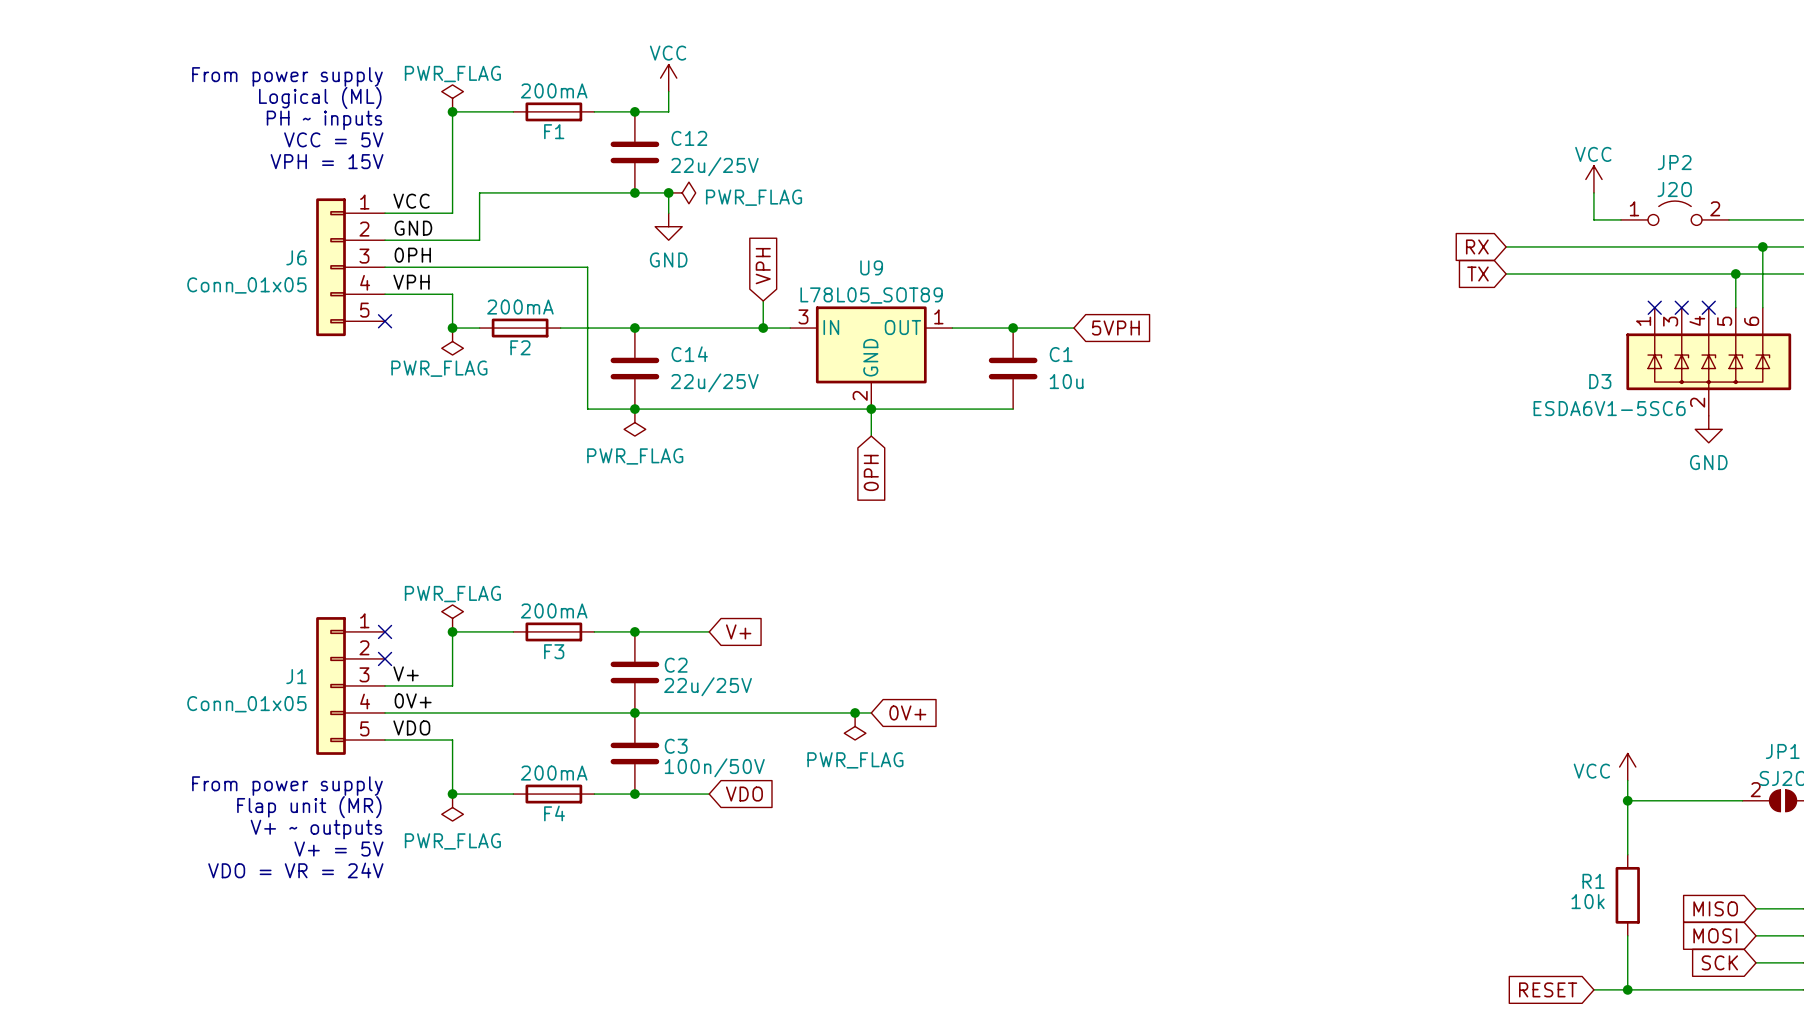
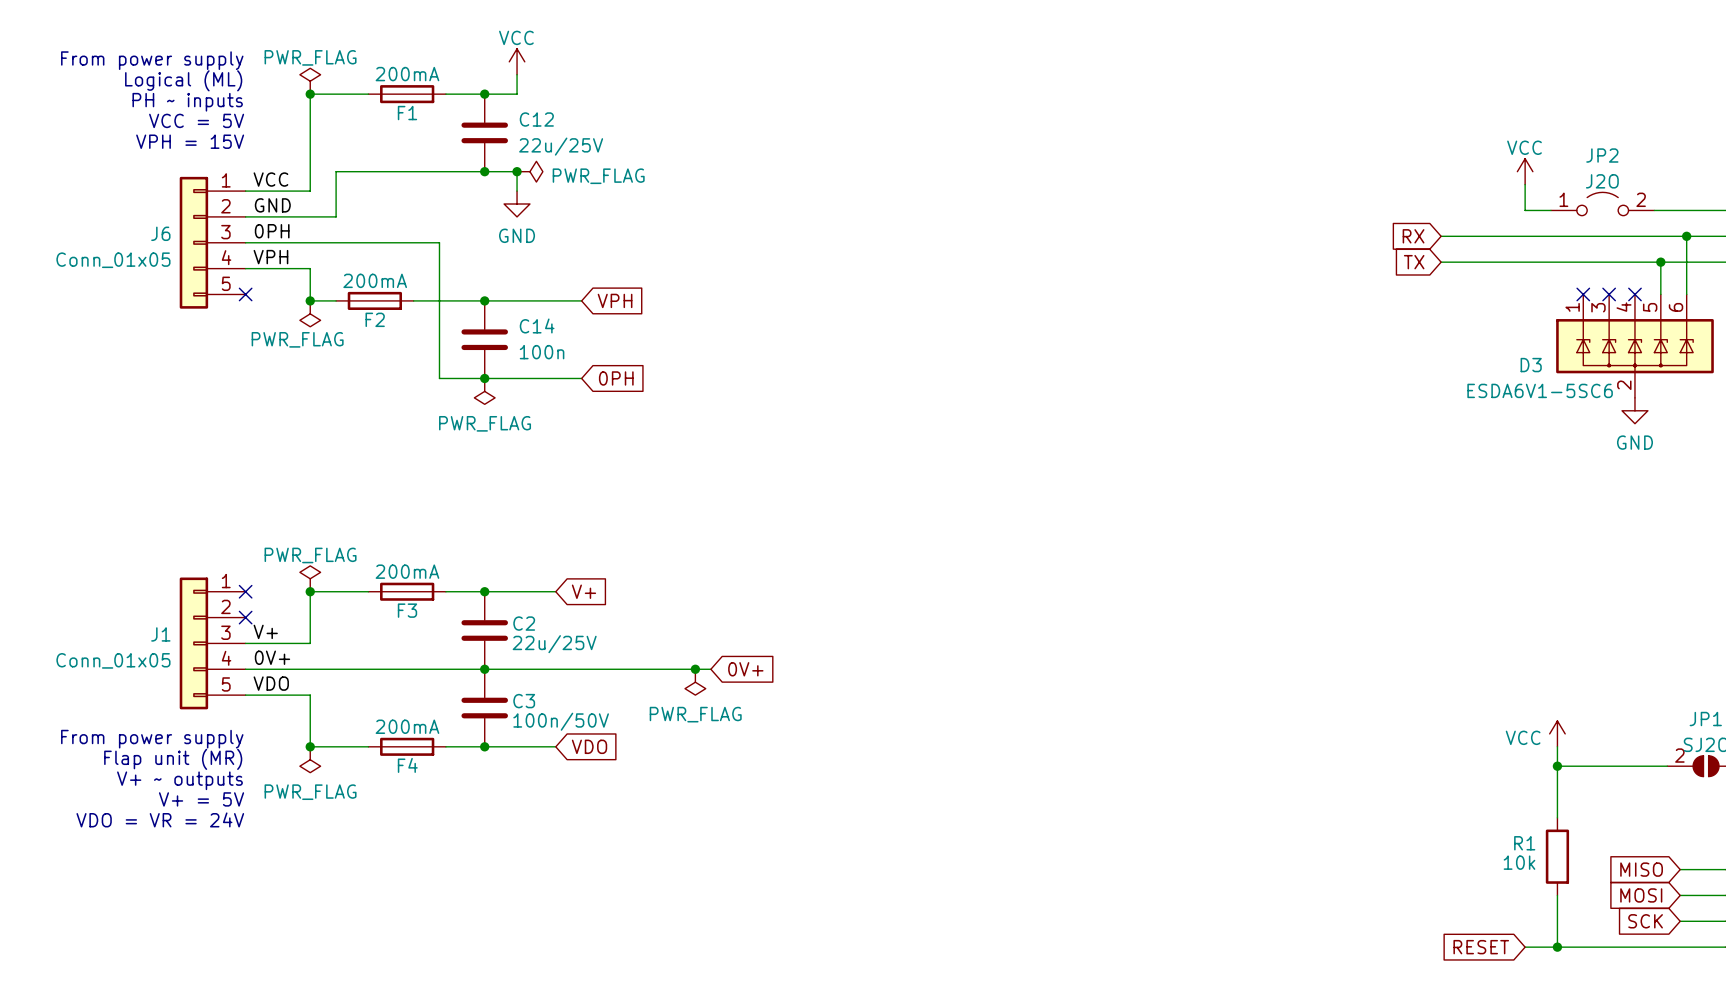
text position: From power supply (287, 76) -> From power supply (152, 60)
power symbol position: VCC (668, 78) -> VCC (517, 61)
power symbol: none -> PWR_FLAG (310, 81)
wire: (668, 91) (668, 111) (594, 111) -> (517, 74) (517, 94) (445, 94)
text position: Logical (ML) (320, 97) -> Logical (ML) (183, 80)
junction: none -> (310, 94)
power symbol: PWR_FLAG (452, 98) -> none
junction: none -> (484, 94)
junction: (452, 111) -> none
wire: (513, 111) (452, 111) (452, 213) (385, 213) -> (368, 94) (310, 94) (310, 191) (245, 191)
F1 position: (553, 111) -> (407, 94)
junction: (634, 111) -> none
text position: PH ~ inputs (324, 120) -> PH ~ inputs (187, 102)
text position: VCC = 5V (333, 139) -> VCC = 5V (196, 120)
C12 position: (634, 152) -> (484, 132)
text position: VPH = 15V (327, 161) -> VPH = 15V (190, 141)
junction: none -> (484, 171)
junction: none -> (517, 171)
power symbol: none -> PWR_FLAG (529, 171)
junction: (634, 192) -> none
junction: (668, 192) -> none
power symbol: PWR_FLAG (682, 192) -> none
label position: VCC (411, 201) -> VCC (270, 179)
wire: (668, 213) (668, 192) (479, 192) (479, 240) (385, 240) -> (517, 191) (517, 171) (336, 171) (336, 216) (245, 216)
power symbol position: GND (668, 226) -> GND (517, 204)
label position: GND (413, 228) -> GND (272, 205)
wire: none -> (245, 242) (439, 242) (439, 378) (581, 378)
label position: 0PH (412, 255) -> 0PH (272, 231)
global label rotation: 0° (763, 266) -> 90° clockwise (615, 300)
global label position: VPH (763, 266) -> VPH (615, 300)
J6 position: (350, 267) -> (212, 242)
wire: (385, 267) (587, 267) (587, 409) (1013, 409) -> none
label position: VPH (411, 282) -> VPH (270, 257)
wire: (385, 294) (452, 294) (452, 328) (479, 328) -> (245, 268) (310, 268) (310, 300) (336, 300)
wire: (763, 301) (763, 328) -> none
no-connect mark: none -> (245, 294)
junction: none -> (310, 300)
wire: none -> (413, 300) (581, 300)
junction: none -> (484, 300)
no-connect mark: (385, 321) -> none
power symbol: none -> PWR_FLAG (310, 313)
junction: (452, 328) -> none
F2 position: (520, 328) -> (374, 300)
wire: (560, 328) (790, 328) -> none
junction: (634, 328) -> none
junction: (763, 328) -> none
wire: (952, 328) (1073, 328) -> none
junction: (1013, 328) -> none
global label: 5VPH (1115, 328) -> none
power symbol: PWR_FLAG (452, 341) -> none
U9: L78L05_SOT89 (871, 357) -> none
C14 position: (634, 368) -> (484, 339)
C1: 10u (1013, 368) -> none
C14 value: 22u/25V (714, 382) -> 100n (542, 352)
junction: none -> (484, 378)
global label: none -> 0PH (616, 378)
power symbol: none -> PWR_FLAG (484, 391)
junction: (634, 409) -> none
wire: (871, 409) (871, 436) -> none
junction: (871, 409) -> none
power symbol: PWR_FLAG (634, 422) -> none
global label: 0PH (871, 472) -> none
power symbol: none -> PWR_FLAG (310, 578)
no-connect mark: none -> (245, 591)
junction: none -> (310, 591)
power symbol: PWR_FLAG (452, 618) -> none
junction: none -> (484, 591)
no-connect mark: (385, 631) -> none
junction: (452, 631) -> none
wire: (513, 631) (452, 631) (452, 685) (385, 685) -> (368, 591) (310, 591) (310, 643) (245, 643)
F3 position: (553, 631) -> (407, 591)
wire: (594, 631) (709, 631) -> (445, 591) (555, 591)
junction: (634, 631) -> none
global label position: V+ (738, 631) -> V+ (583, 591)
no-connect mark: none -> (245, 617)
no-connect mark: (385, 658) -> none
C2 position: (634, 672) -> (484, 630)
label position: V+ (406, 673) -> V+ (265, 631)
J1 position: (350, 685) -> (212, 643)
junction: none -> (484, 669)
junction: none -> (695, 669)
label position: 0V+ (413, 700) -> 0V+ (272, 657)
wire: (385, 712) (871, 712) -> (245, 669) (710, 669)
junction: (634, 712) -> none
junction: (855, 712) -> none
global label position: 0V+ (907, 712) -> 0V+ (745, 669)
power symbol position: PWR_FLAG (855, 726) -> PWR_FLAG (695, 682)
label position: VDO (411, 727) -> VDO (271, 683)
wire: (385, 740) (452, 740) (452, 794) (513, 794) -> (245, 695) (310, 695) (310, 746) (368, 746)
C3 position: (634, 753) -> (484, 708)
junction: none -> (310, 746)
junction: none -> (484, 746)
text position: From power supply (287, 786) -> From power supply (152, 739)
power symbol: none -> PWR_FLAG (310, 759)
junction: (452, 794) -> none
F4 position: (553, 794) -> (407, 746)
wire: (594, 794) (709, 794) -> (445, 746) (555, 746)
junction: (634, 794) -> none
global label position: VDO (744, 794) -> VDO (589, 746)
text position: Flap unit (MR) (309, 807) -> Flap unit (MR) (173, 759)
power symbol: PWR_FLAG (452, 807) -> none
text position: V+ ~ outputs (316, 829) -> V+ ~ outputs (179, 780)
text position: V+ = 5V (338, 849) -> V+ = 5V (201, 799)
text position: VDO = VR = 24V (295, 870) -> VDO = VR = 24V (160, 819)

